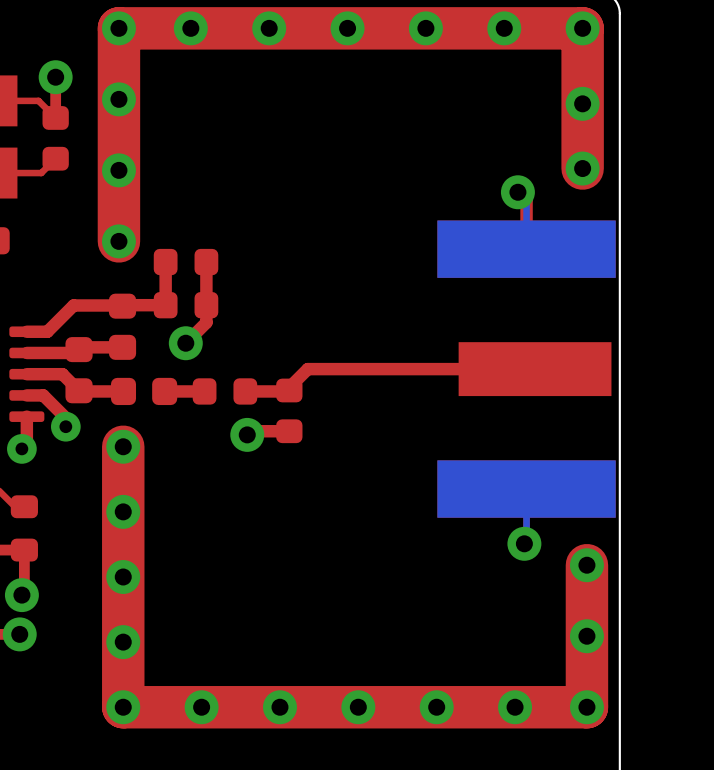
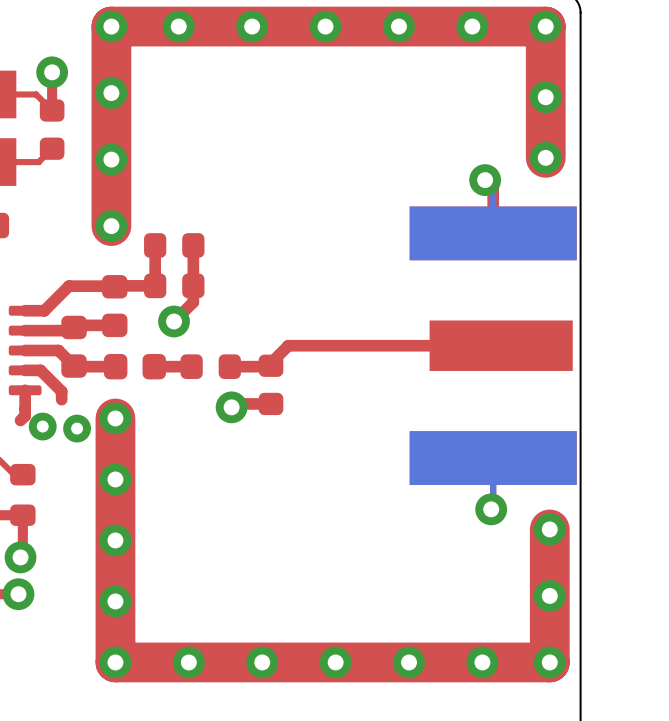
via: (65, 426) -> none
via: (21, 448) -> none
via: none -> (42, 426)
via: none -> (77, 428)

